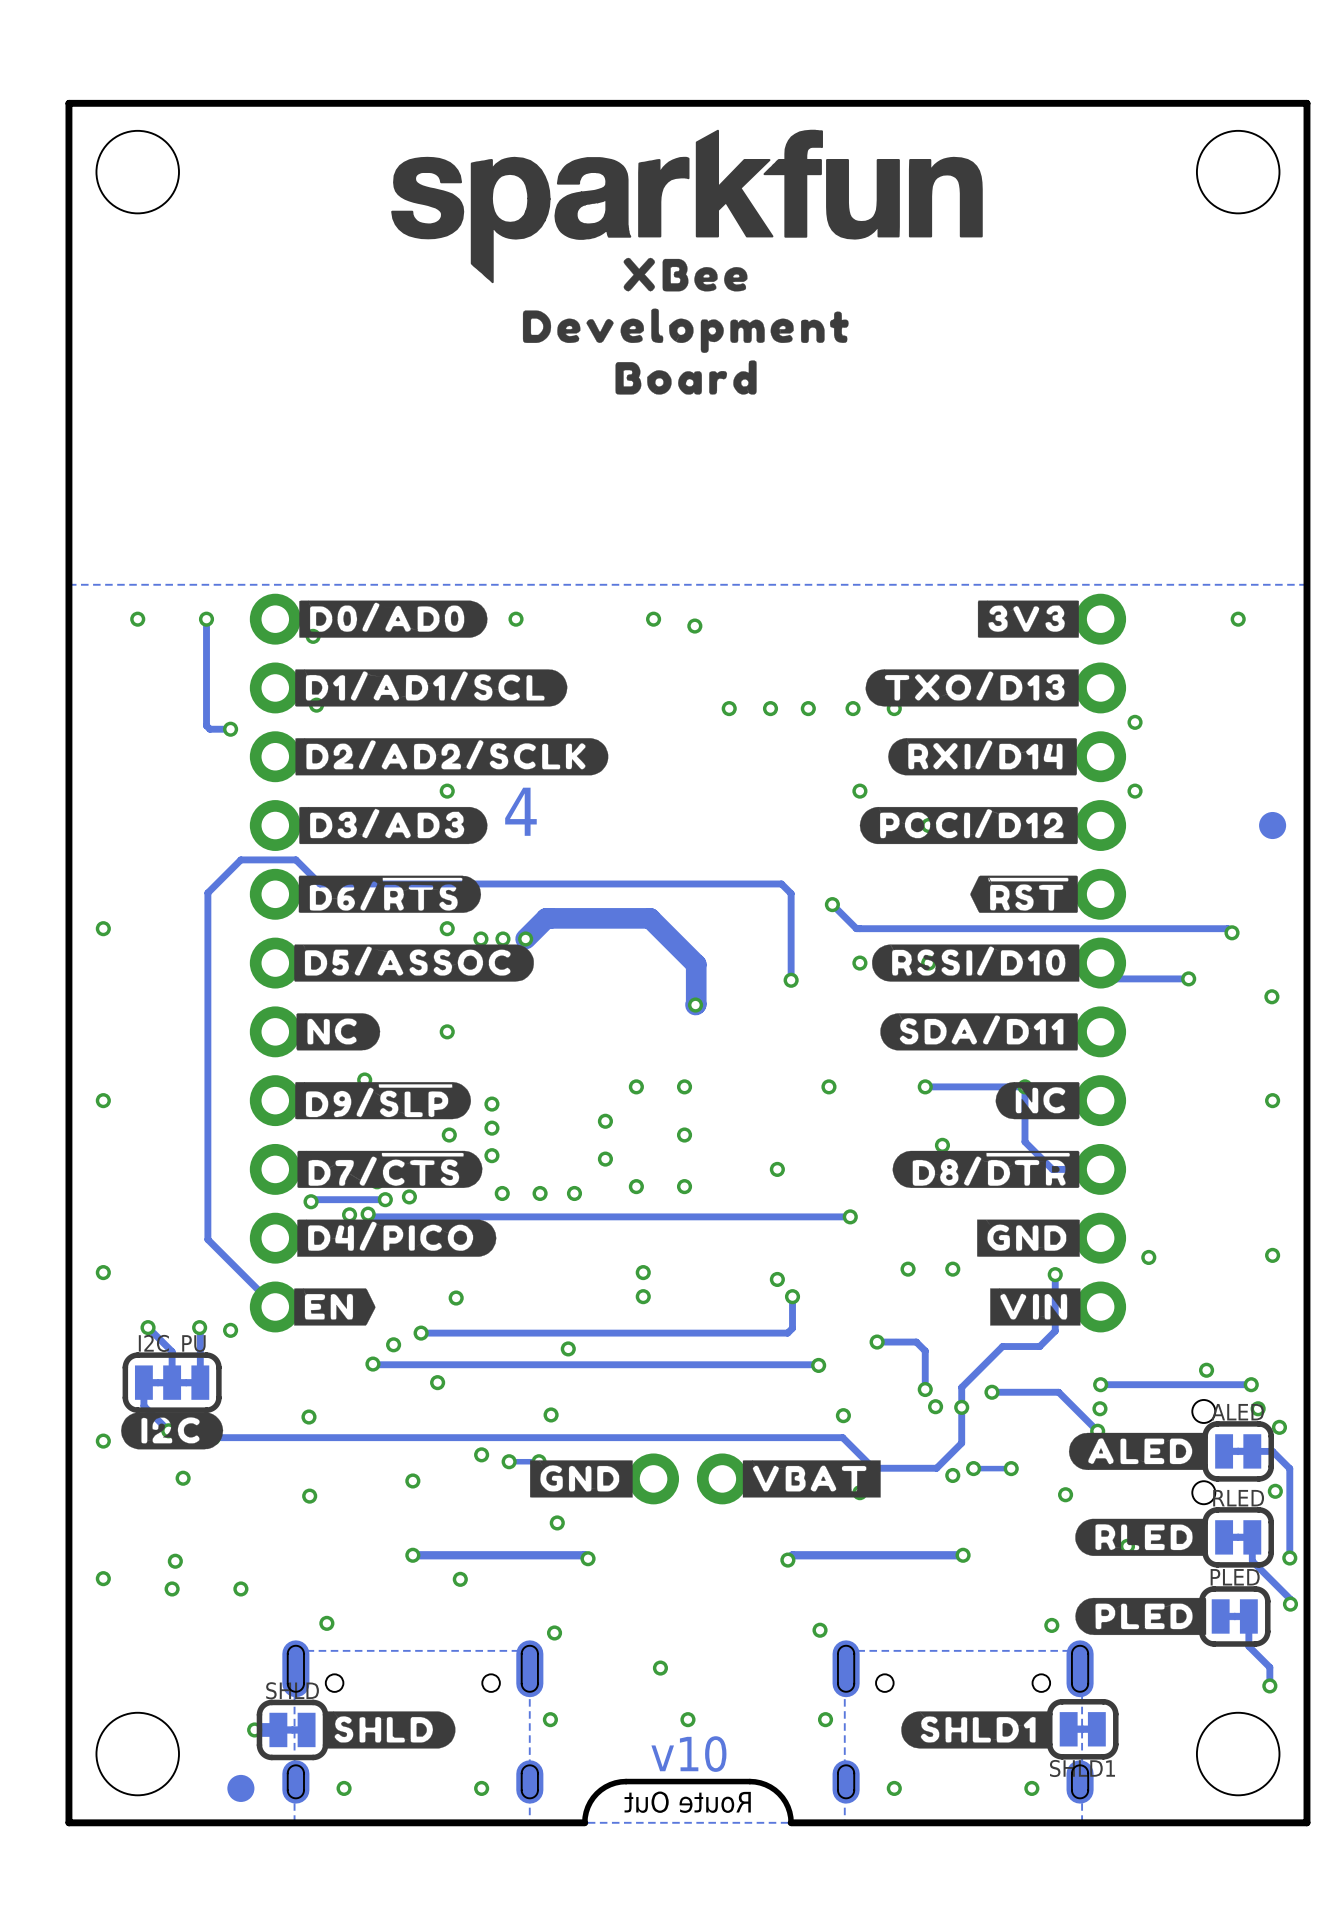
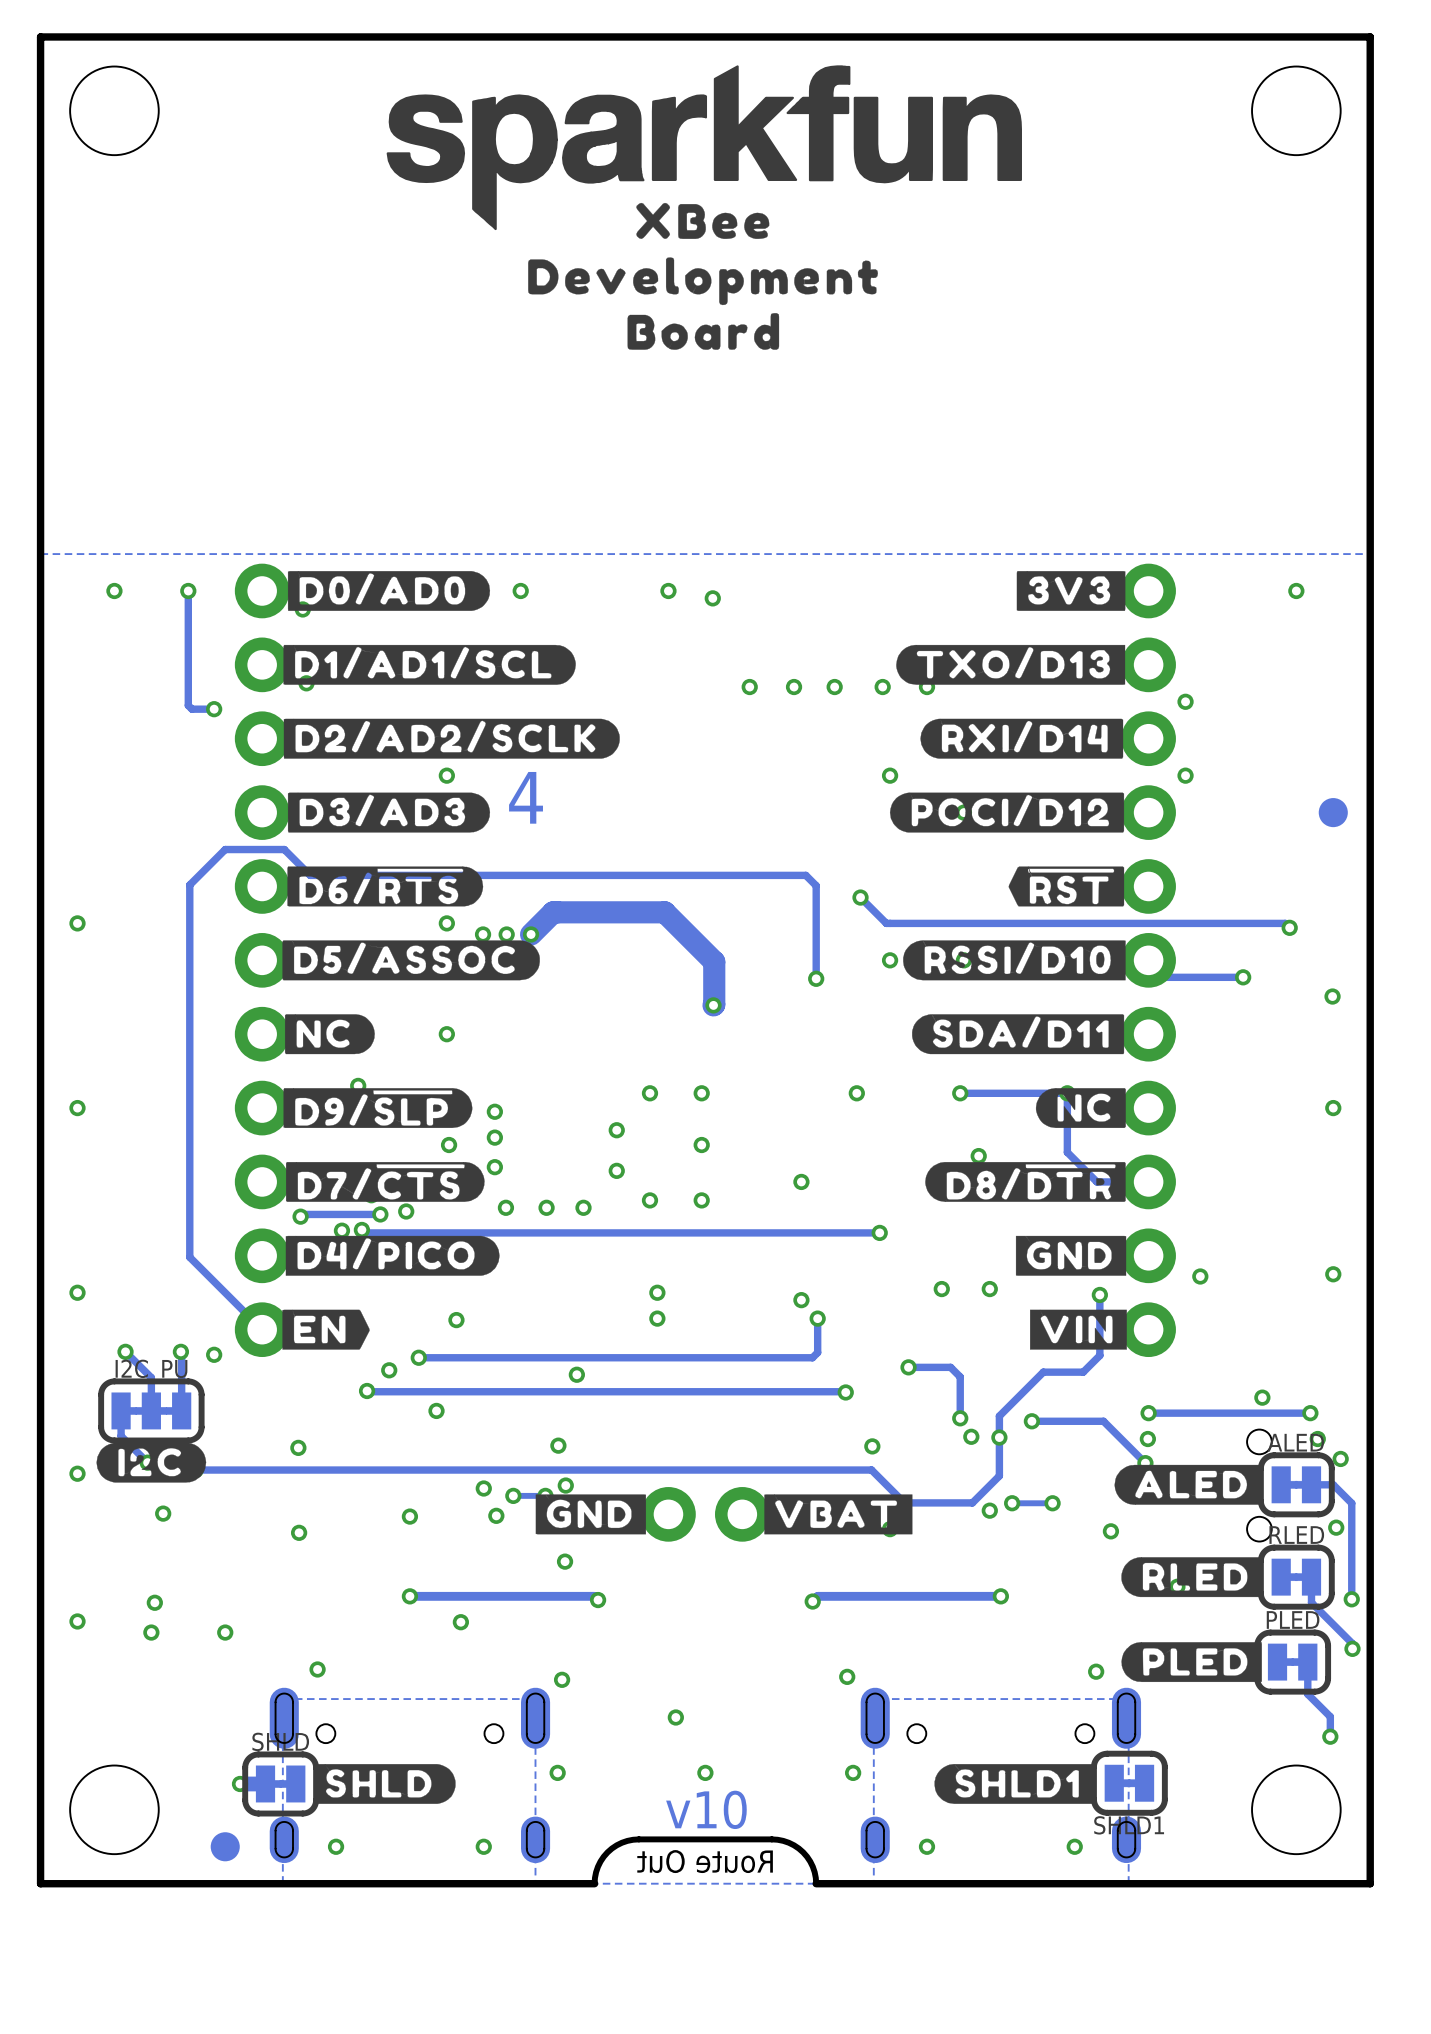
via: none -> (565, 1485)
via: none -> (496, 1515)

